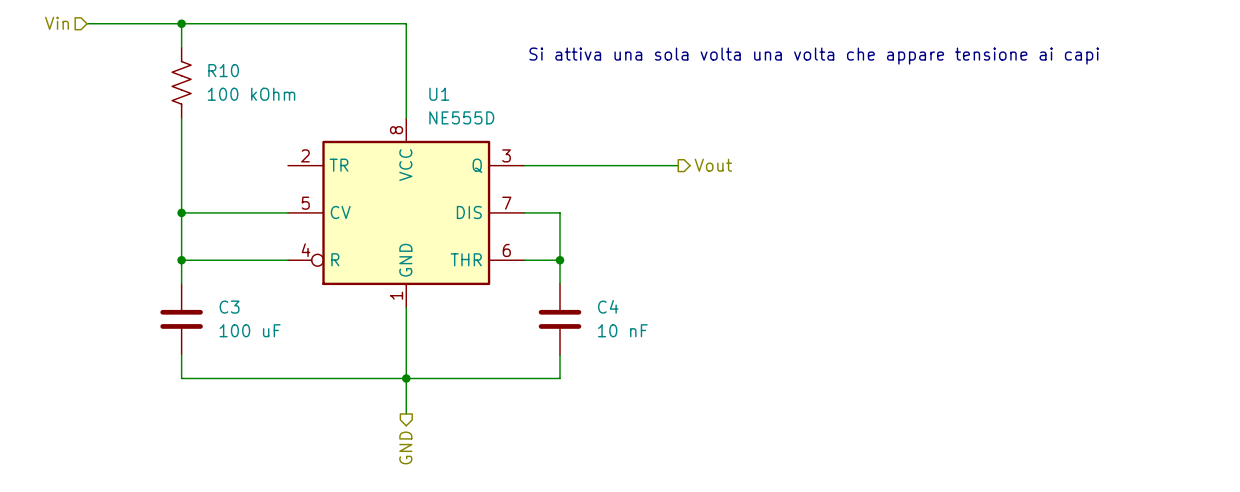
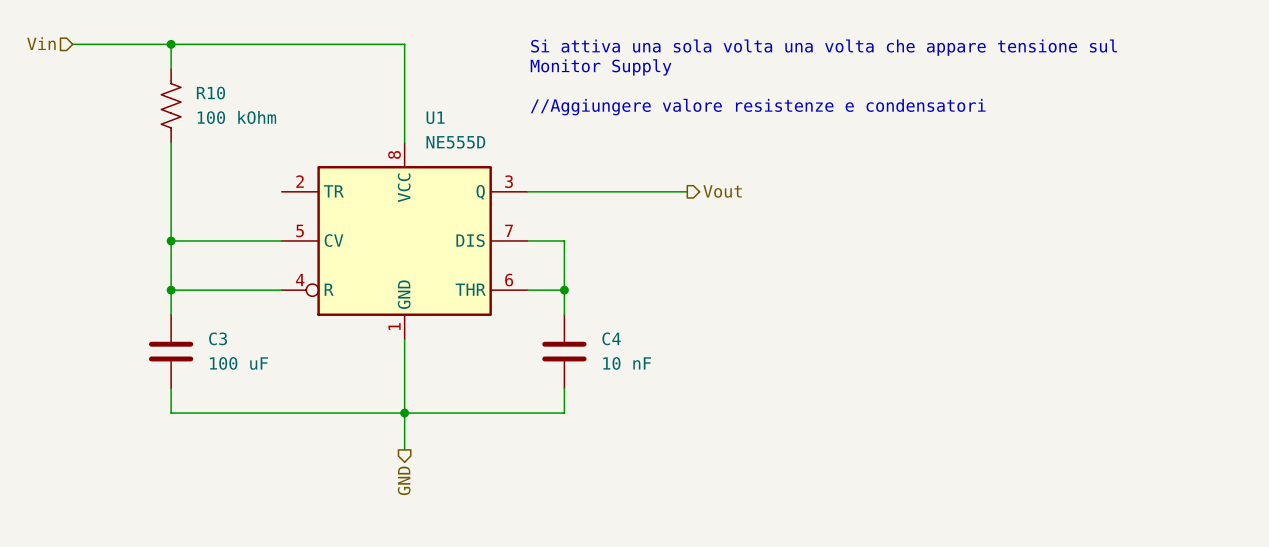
text: none -> Si attiva una sola volta una volta che appare tensione sul (824, 47)
text: none -> Monitor Supply (601, 67)
text: Si attiva una sola volta una volta che appare tensione ai capi (814, 56) -> none
text: none -> //Aggiungere valore resistenze e condensatori (758, 107)

